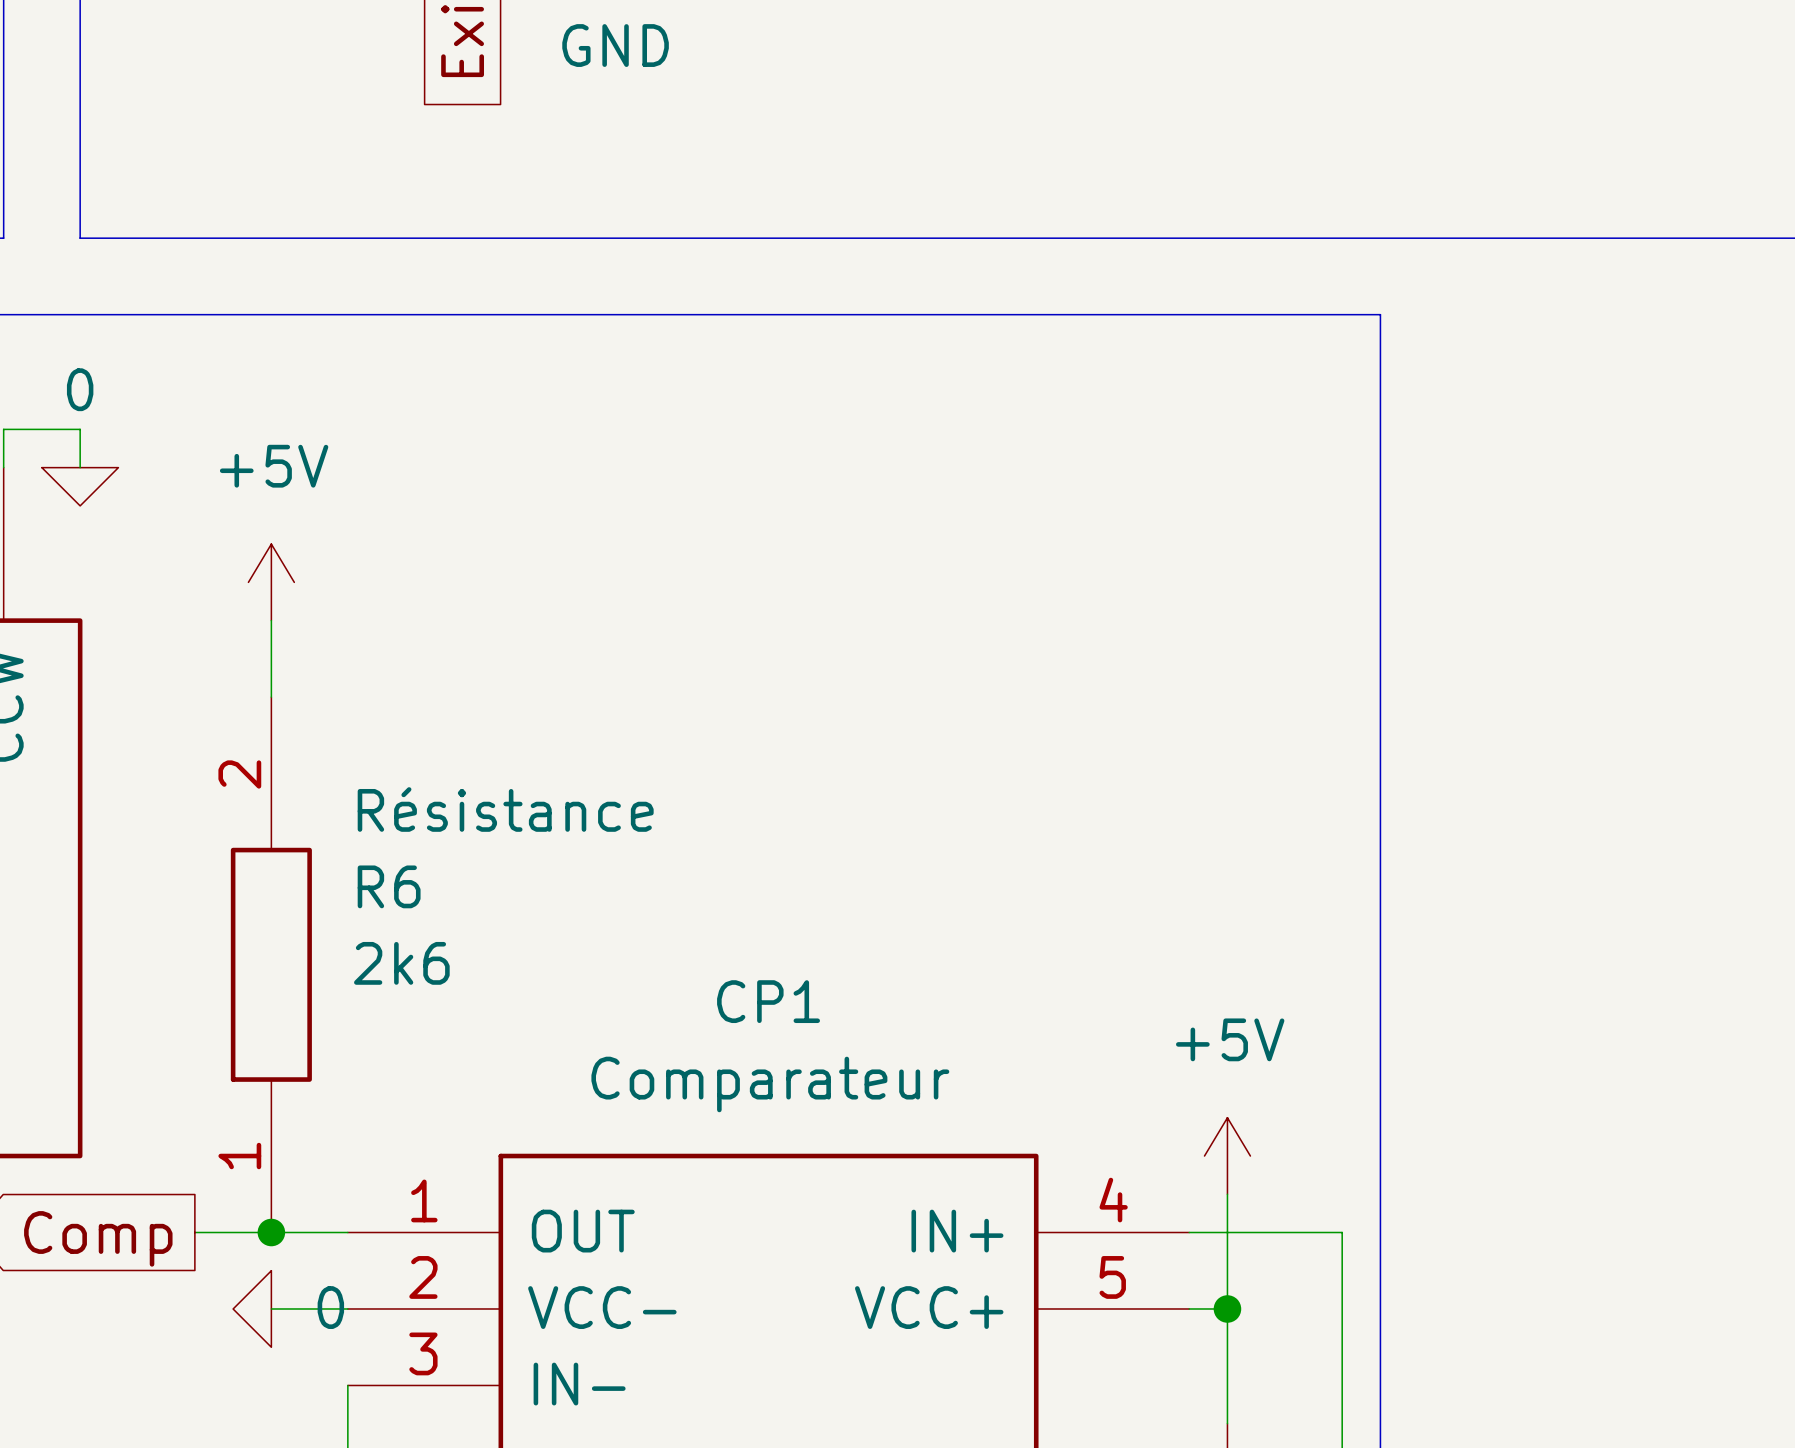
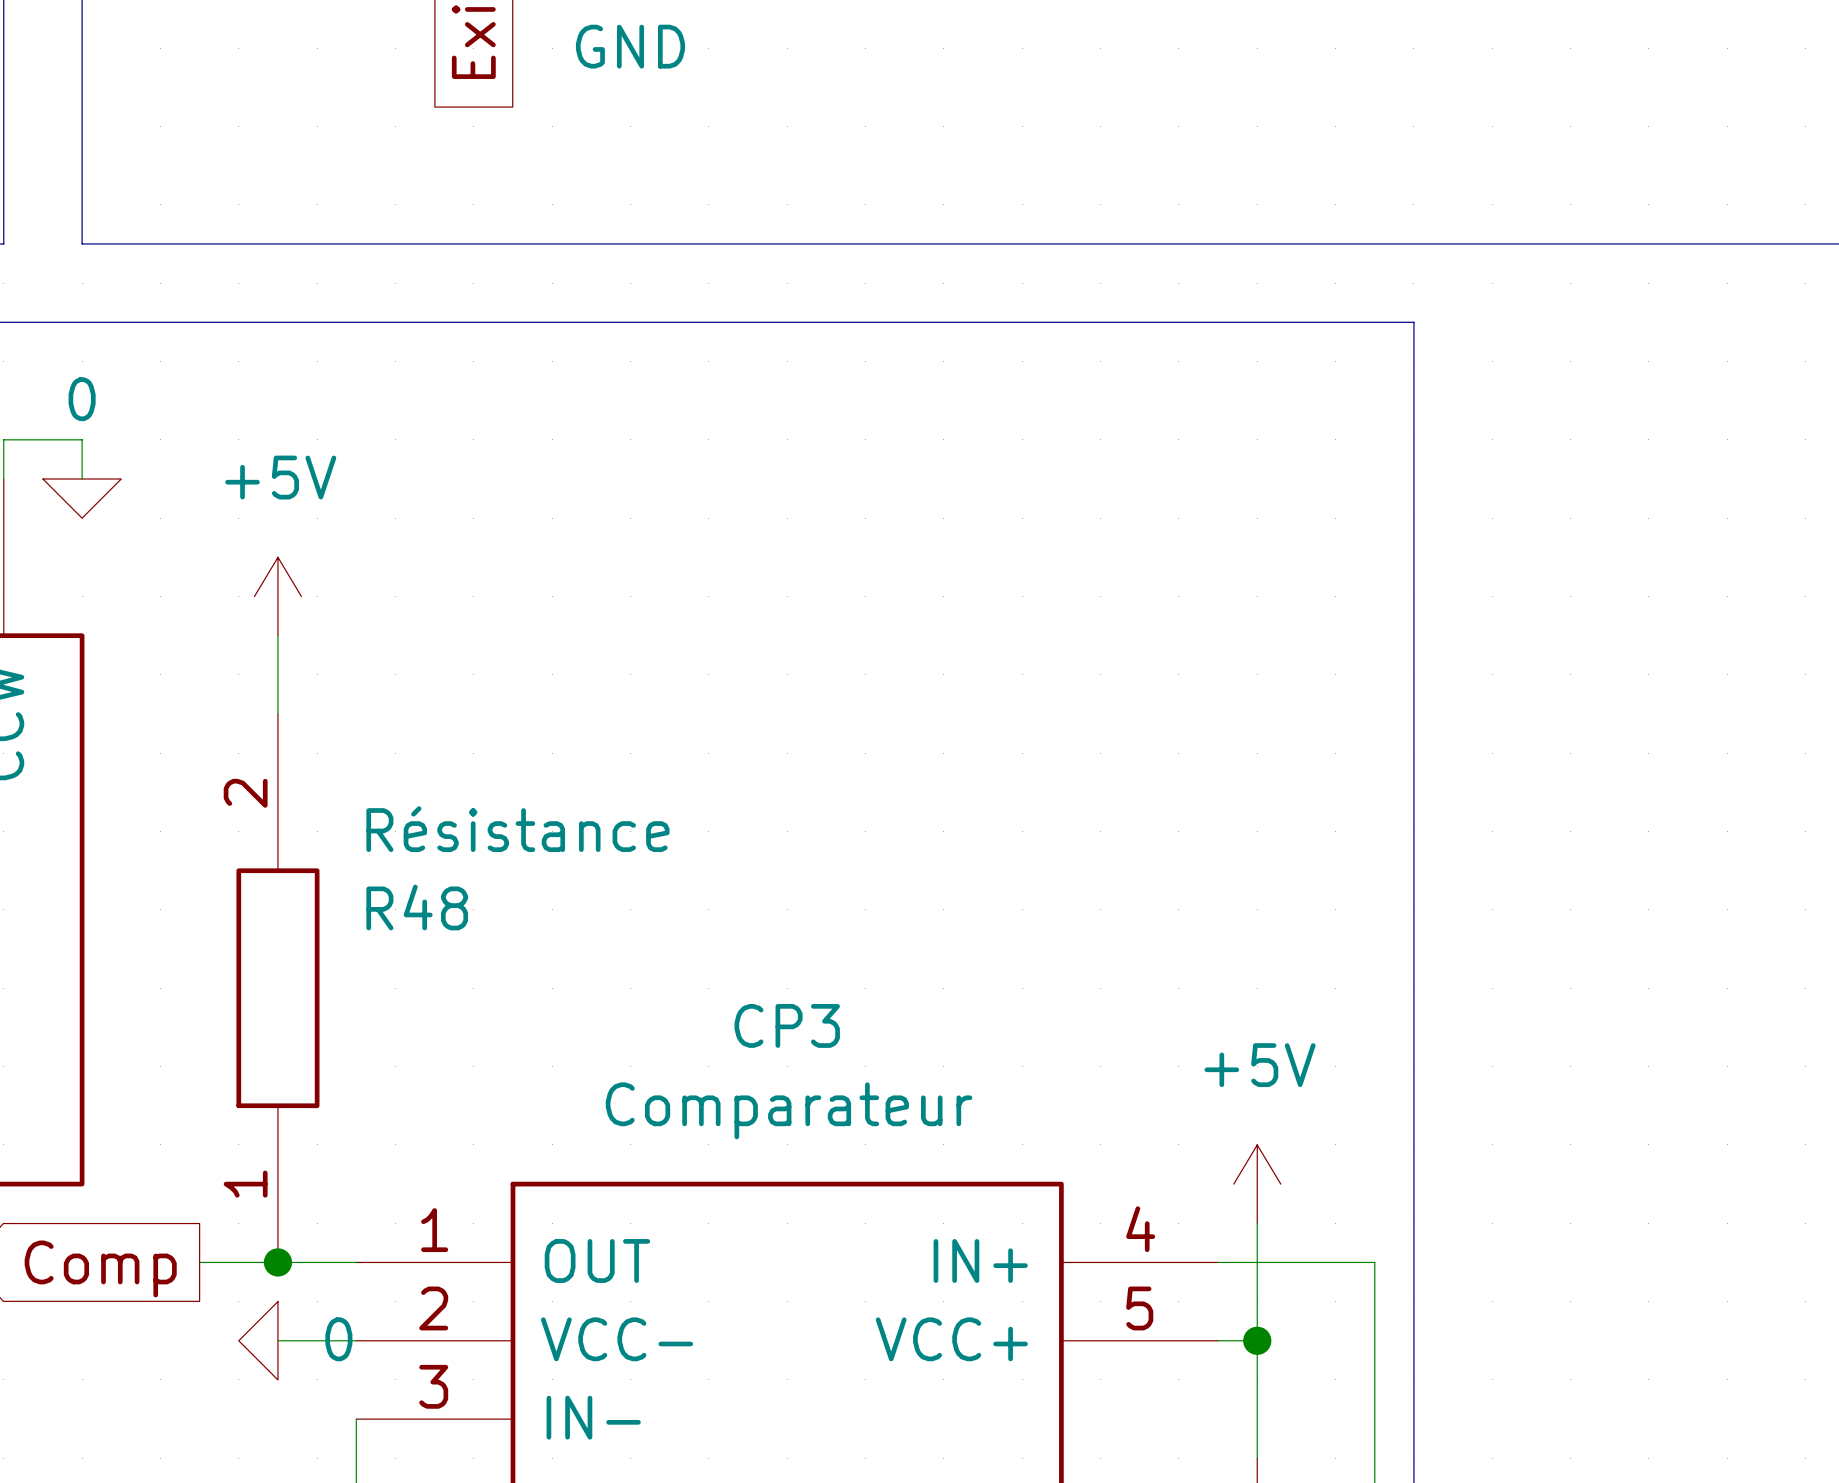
R6 name: R6 (389, 886) -> R48 (417, 907)
R6 text: 2k6 (401, 963) -> none
CP1 name: CP1 (768, 1001) -> CP3 (787, 1025)

